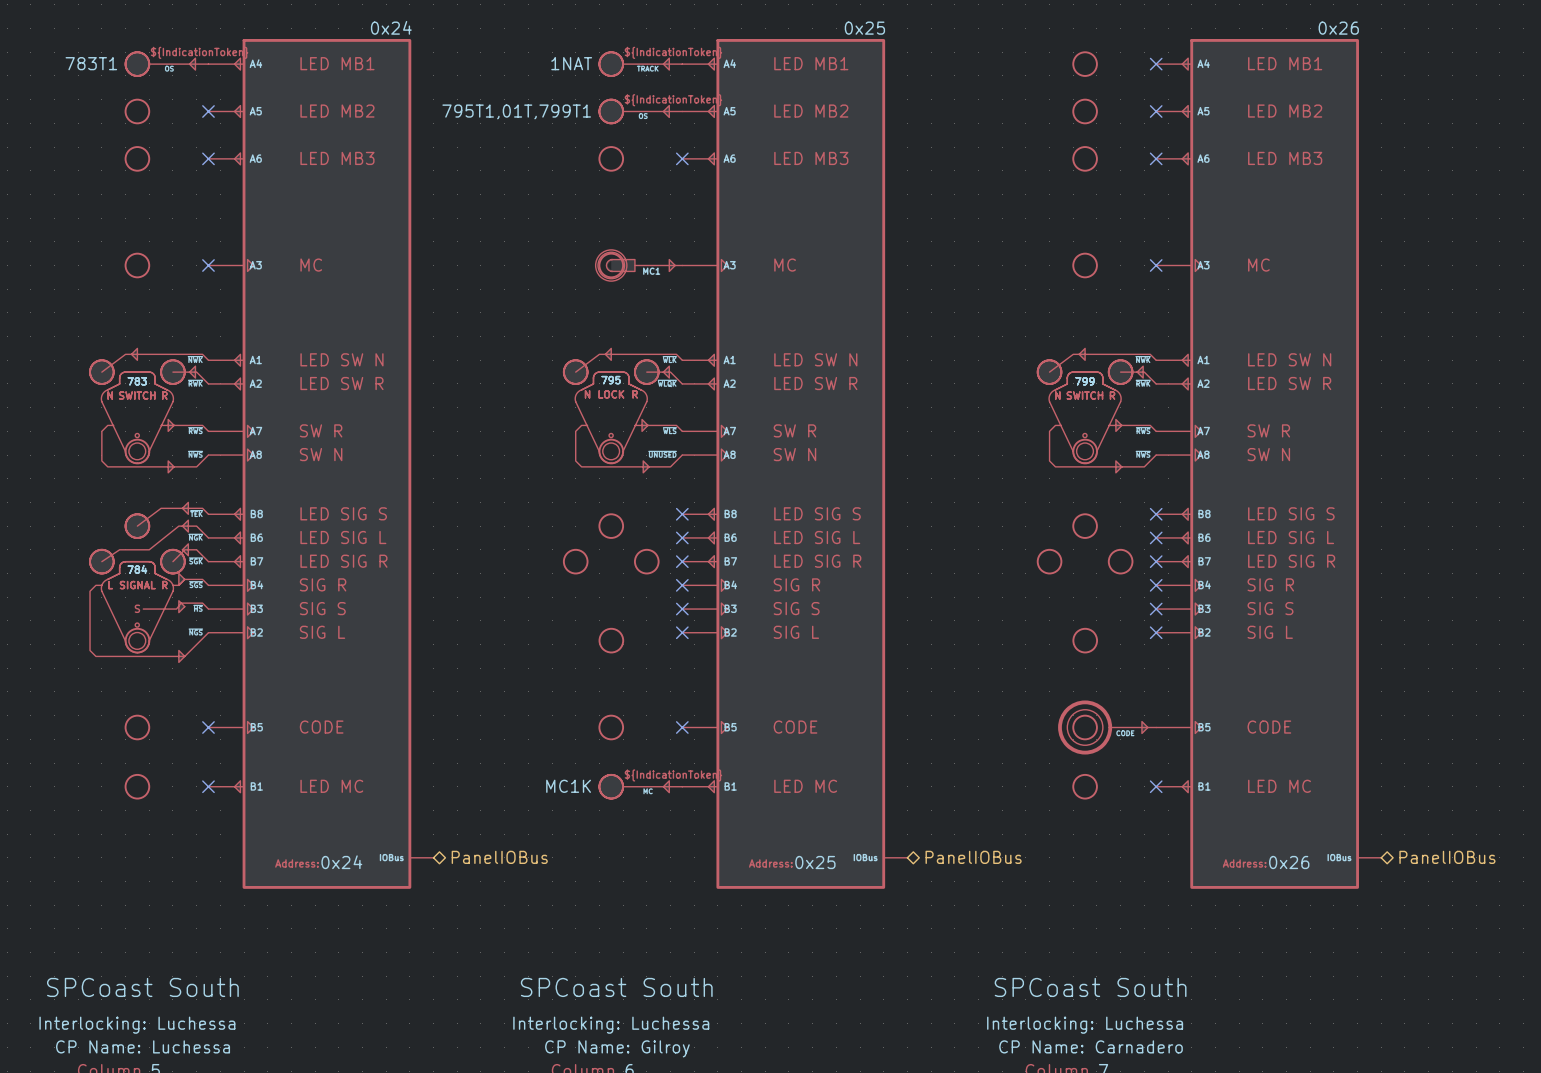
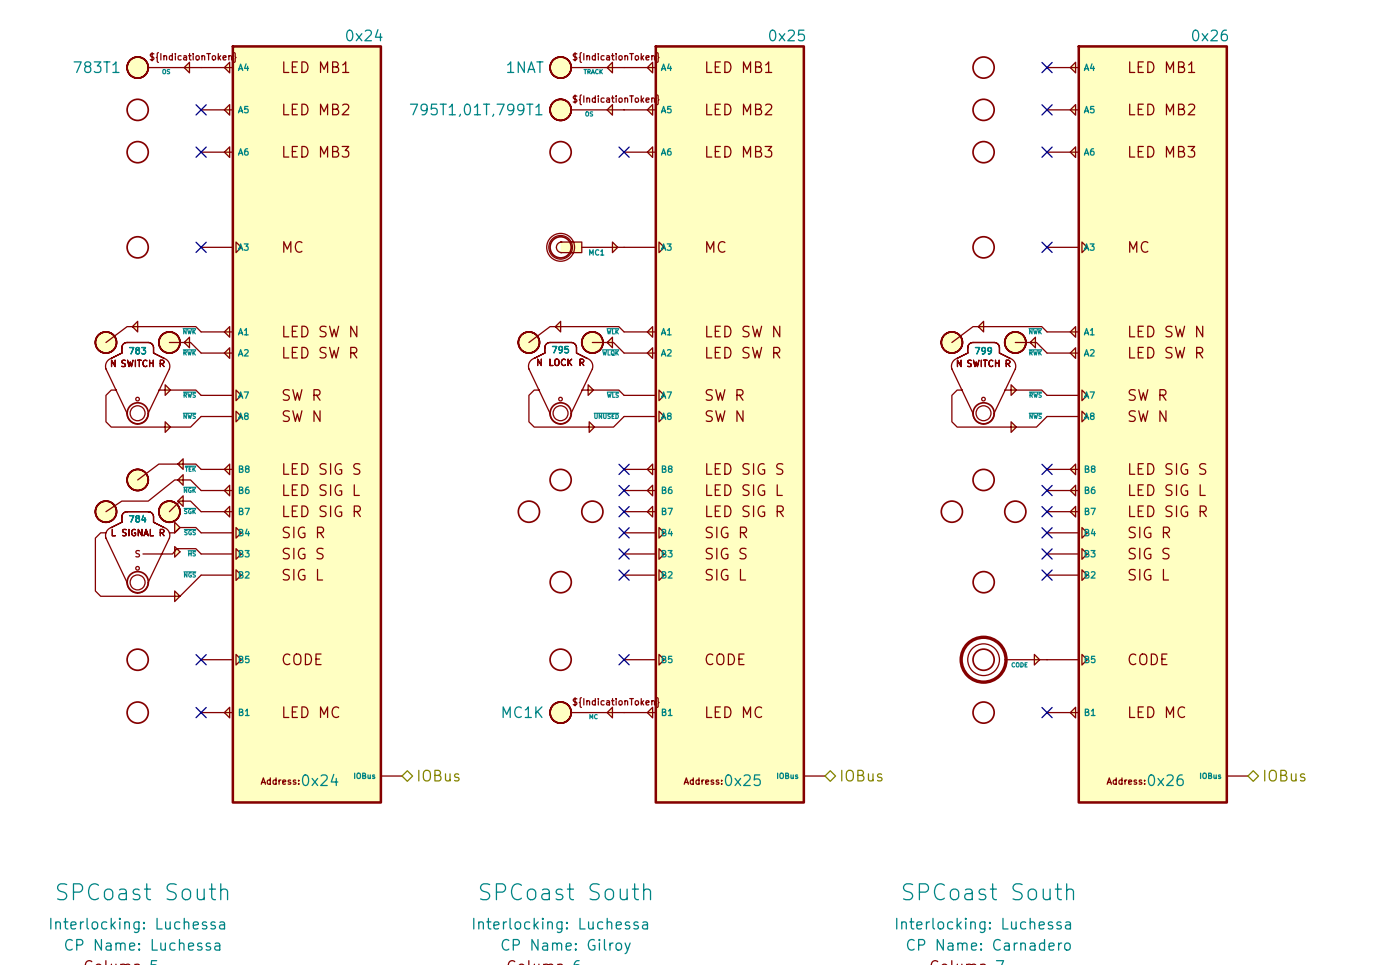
hierarchical label: PanelIOBus (499, 857) -> IOBus (438, 775)
hierarchical label: PanelIOBus (973, 857) -> IOBus (861, 775)
hierarchical label: PanelIOBus (1447, 857) -> IOBus (1284, 775)

